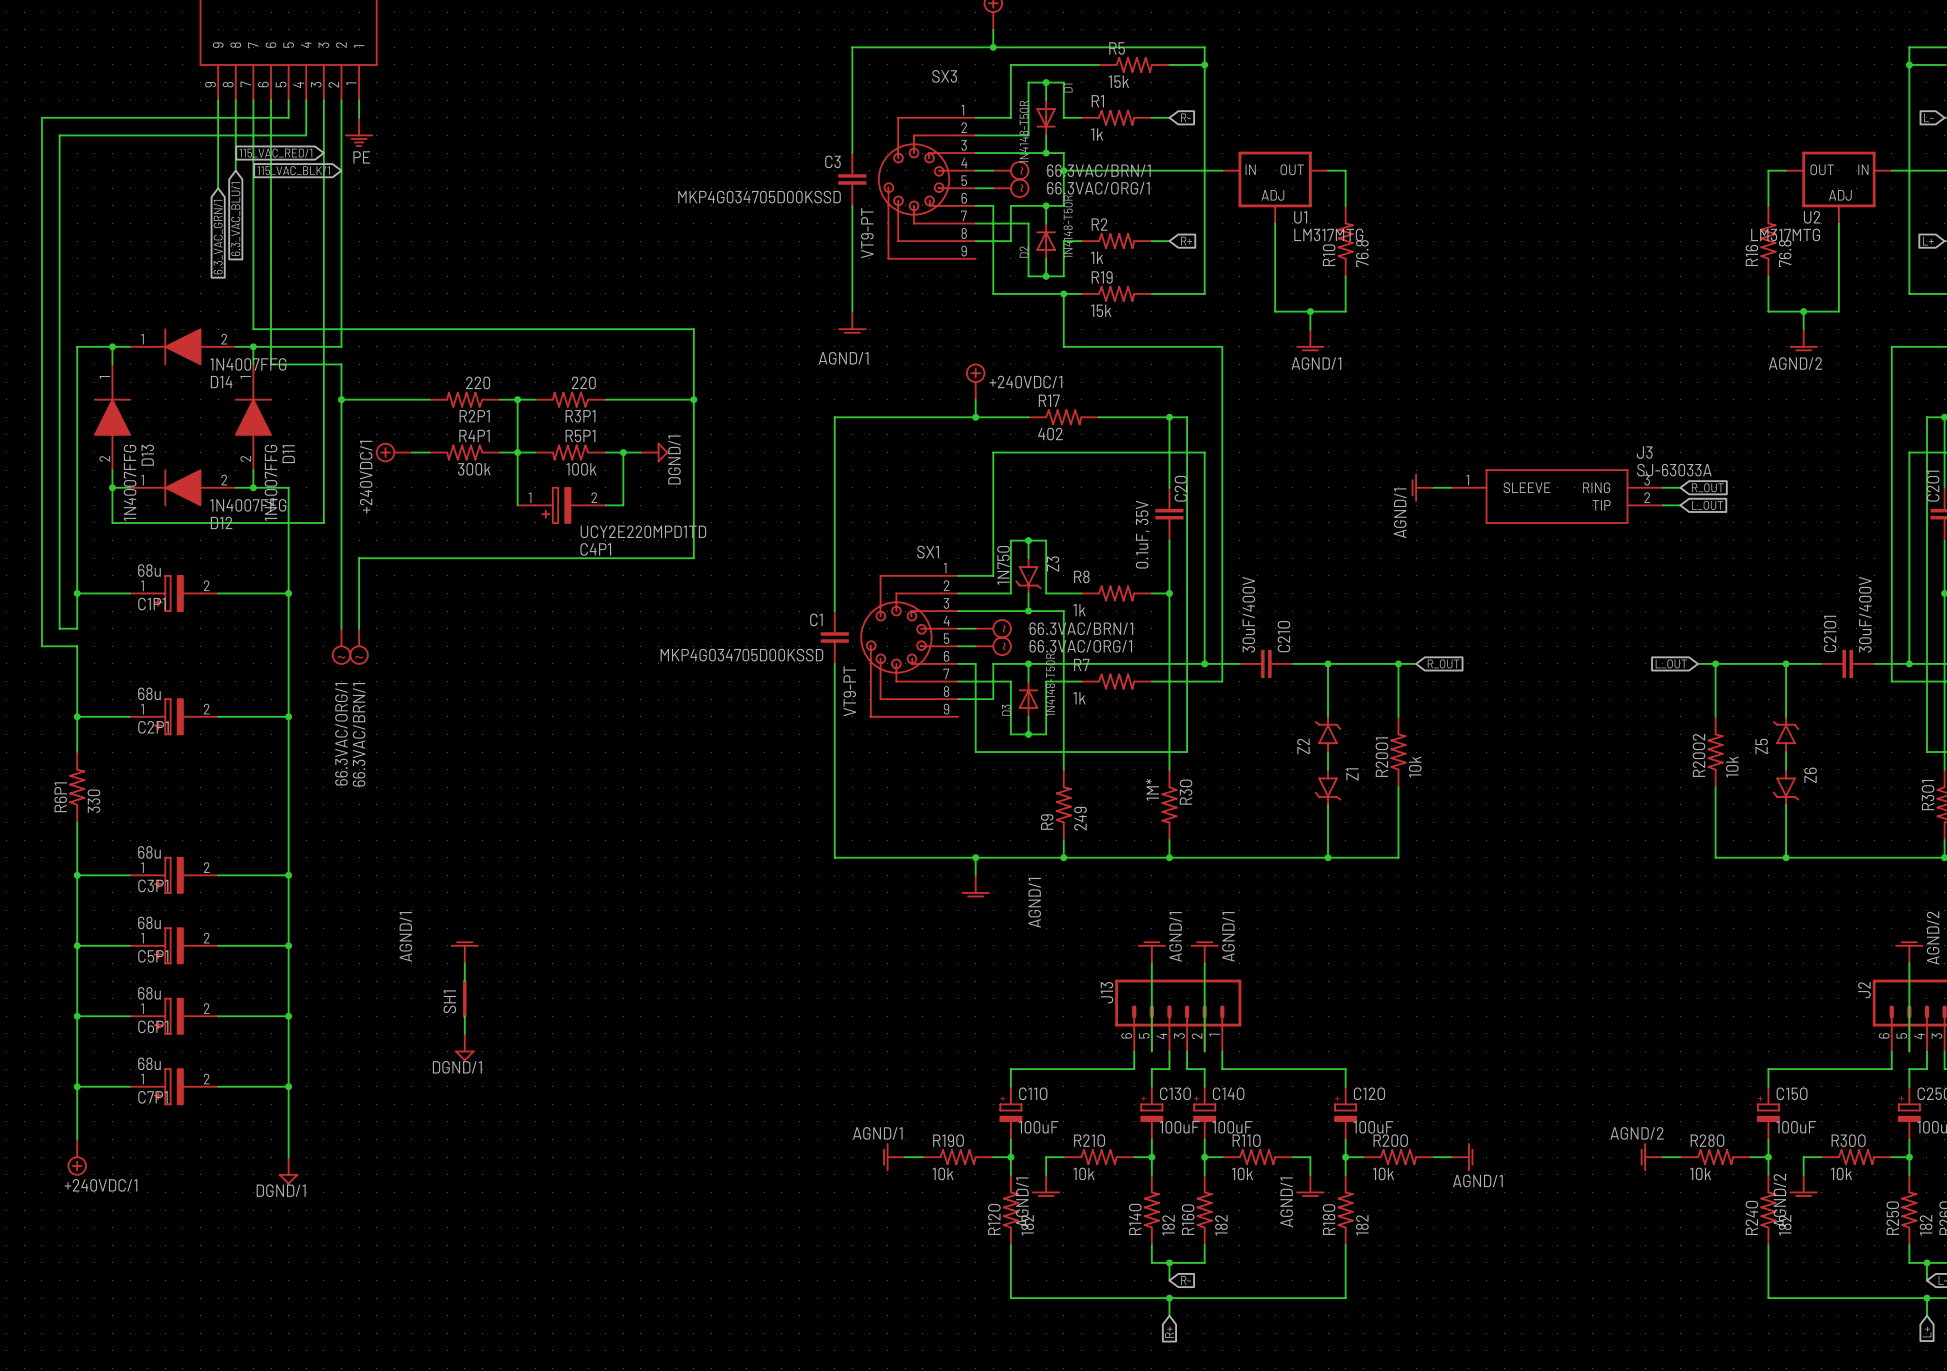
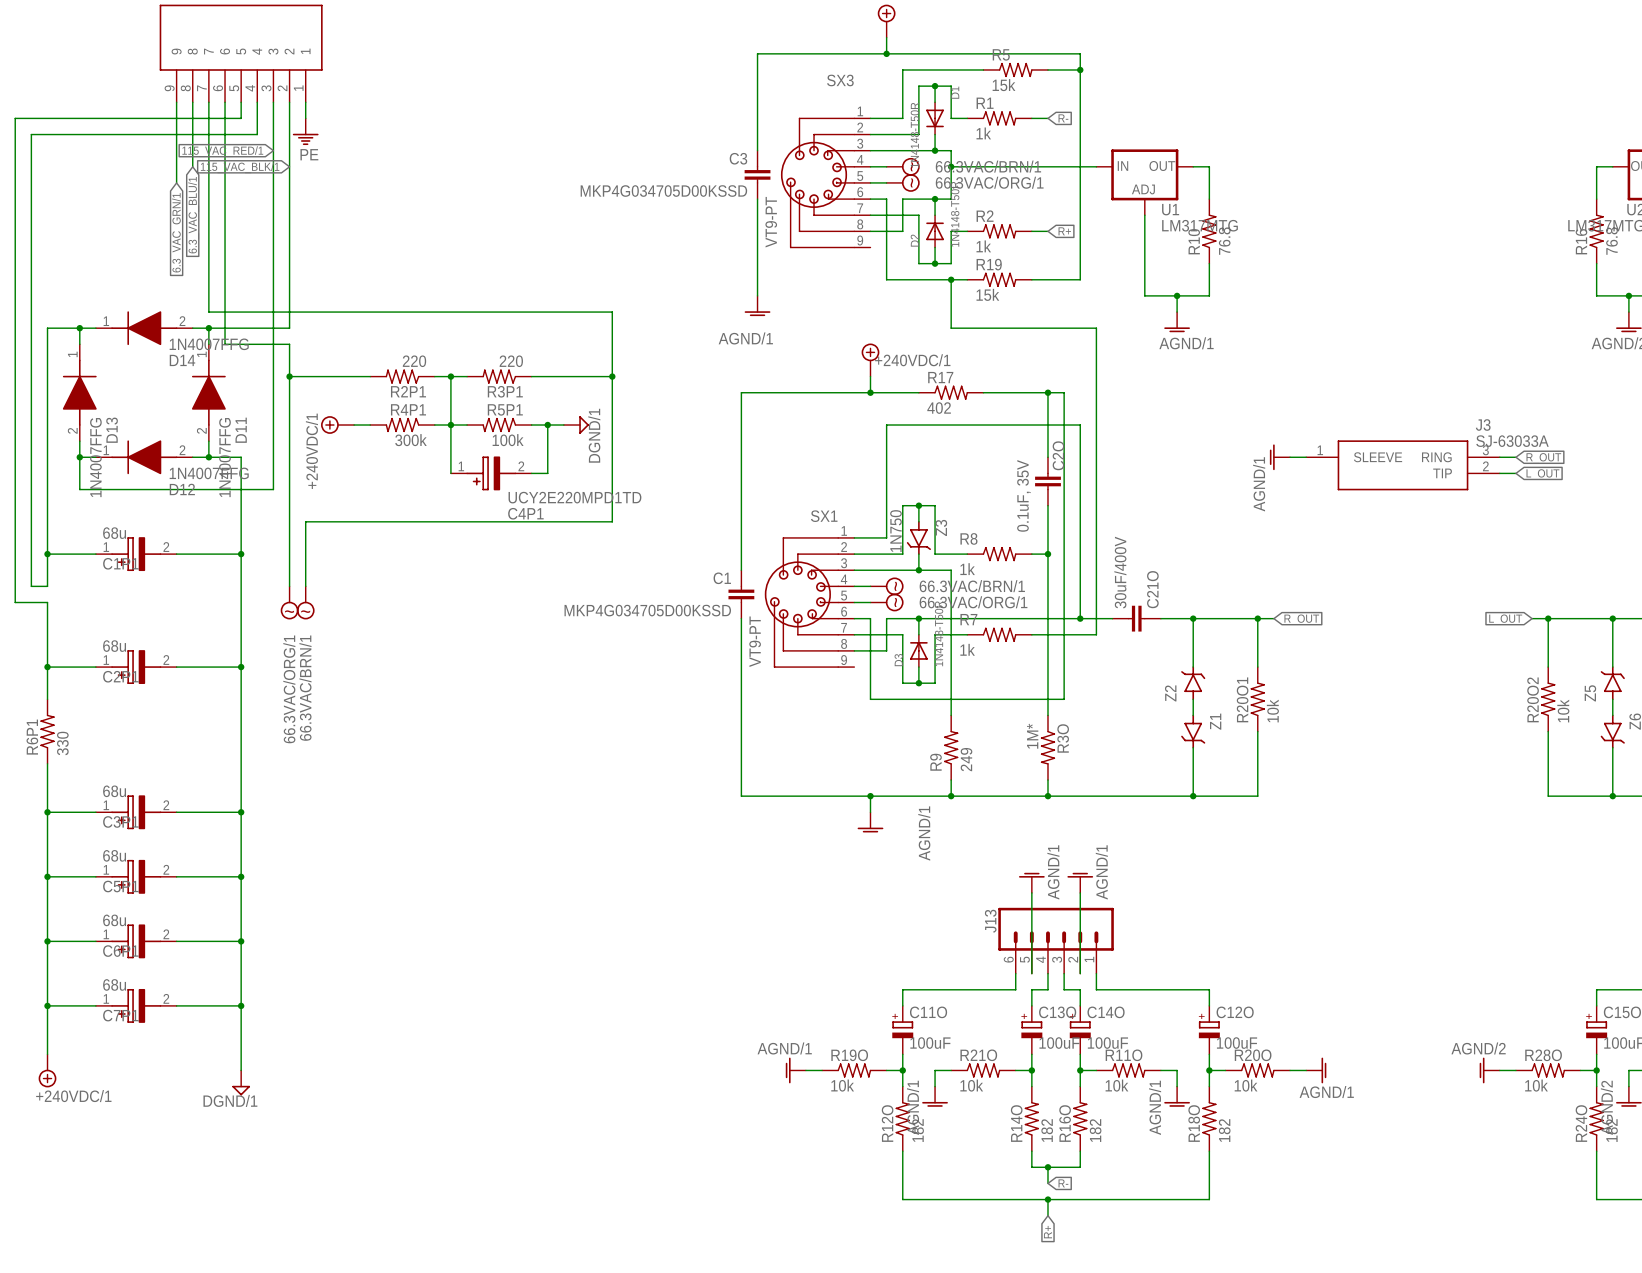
power symbol: AGND/1 (464, 952) -> none
wire: (464, 963) (464, 981) -> none
SH1: (464, 998) -> none
wire: (464, 1016) (464, 1033) -> none
power symbol: DGND/1 (464, 1047) -> none

